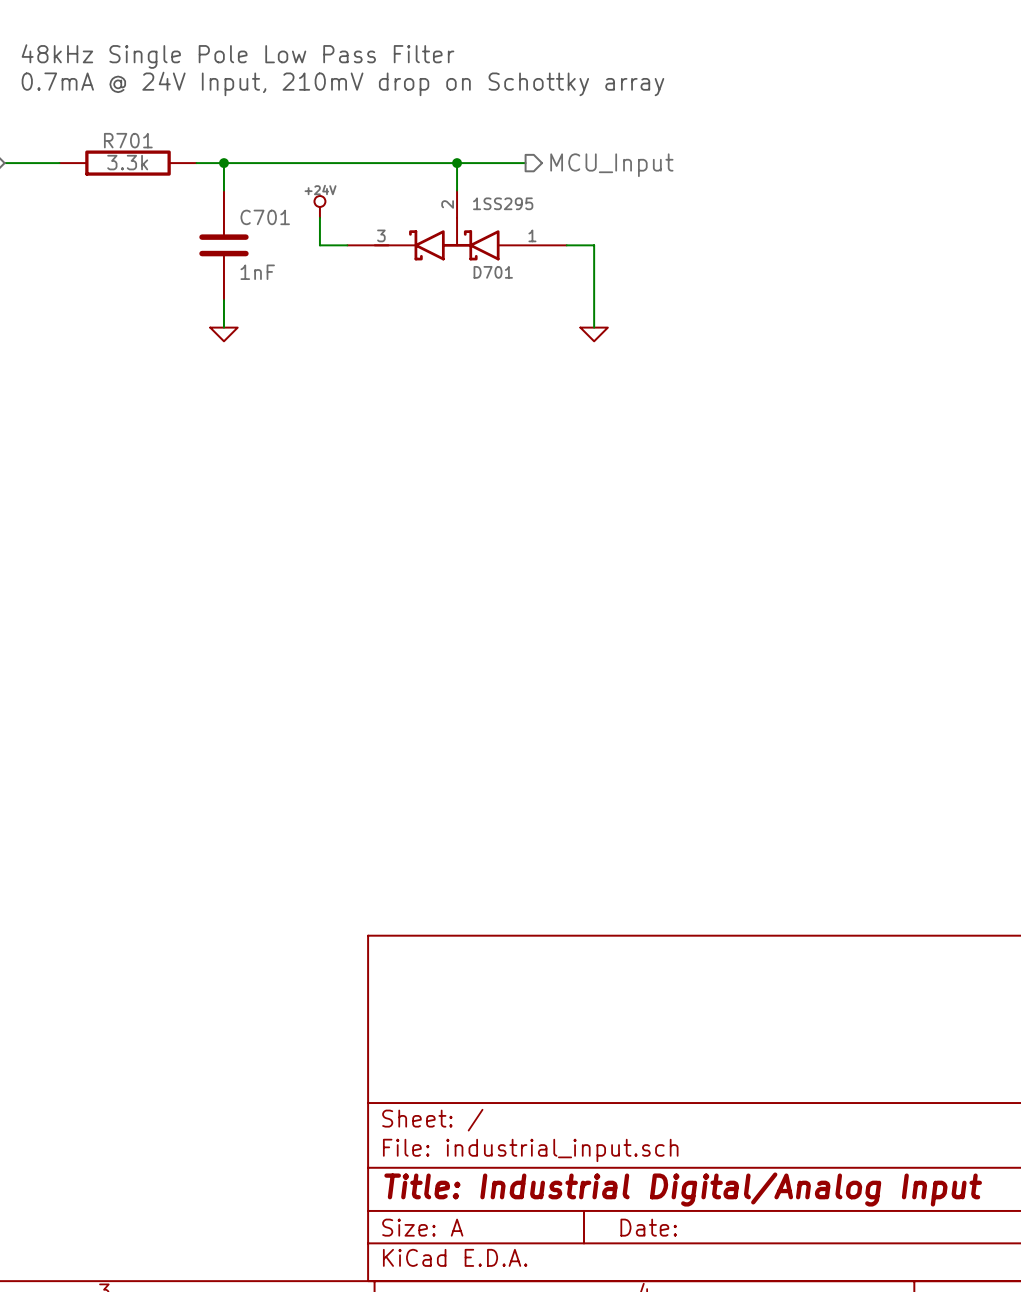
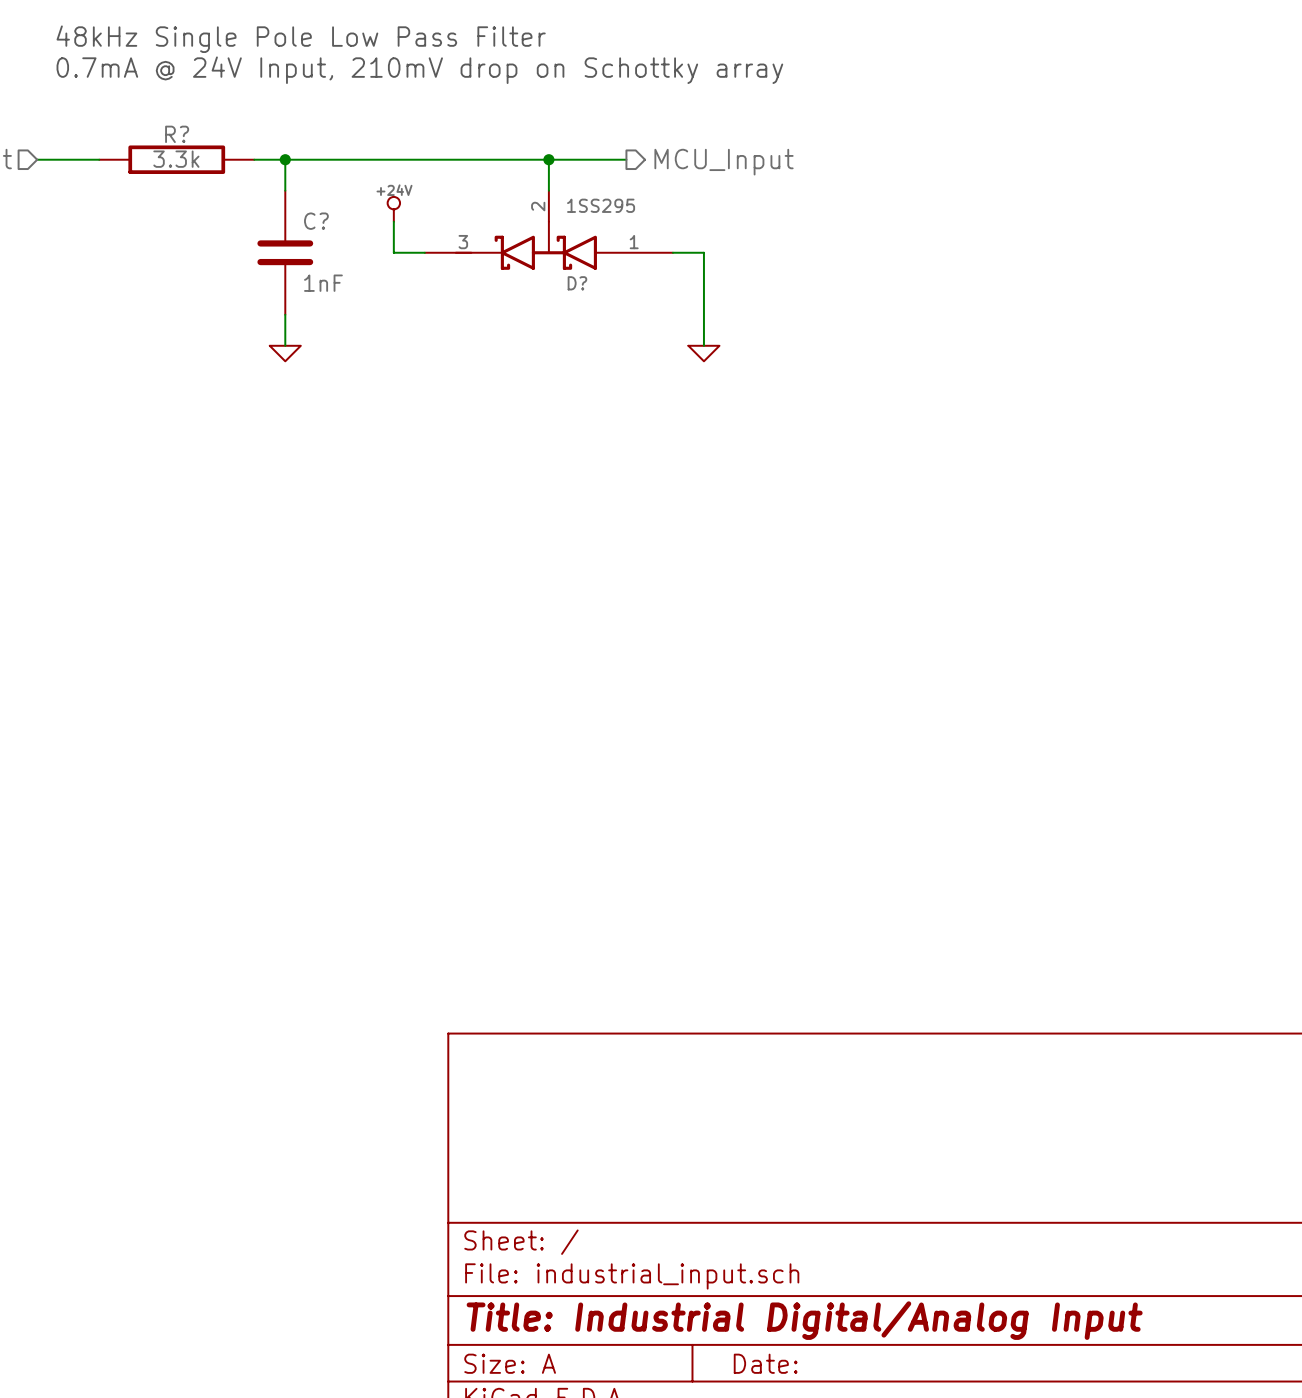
R701 name: R701 (128, 140) -> R? (177, 134)
C701 name: C701 (265, 217) -> C? (316, 221)
D701 name: D701 (493, 272) -> D? (577, 283)

